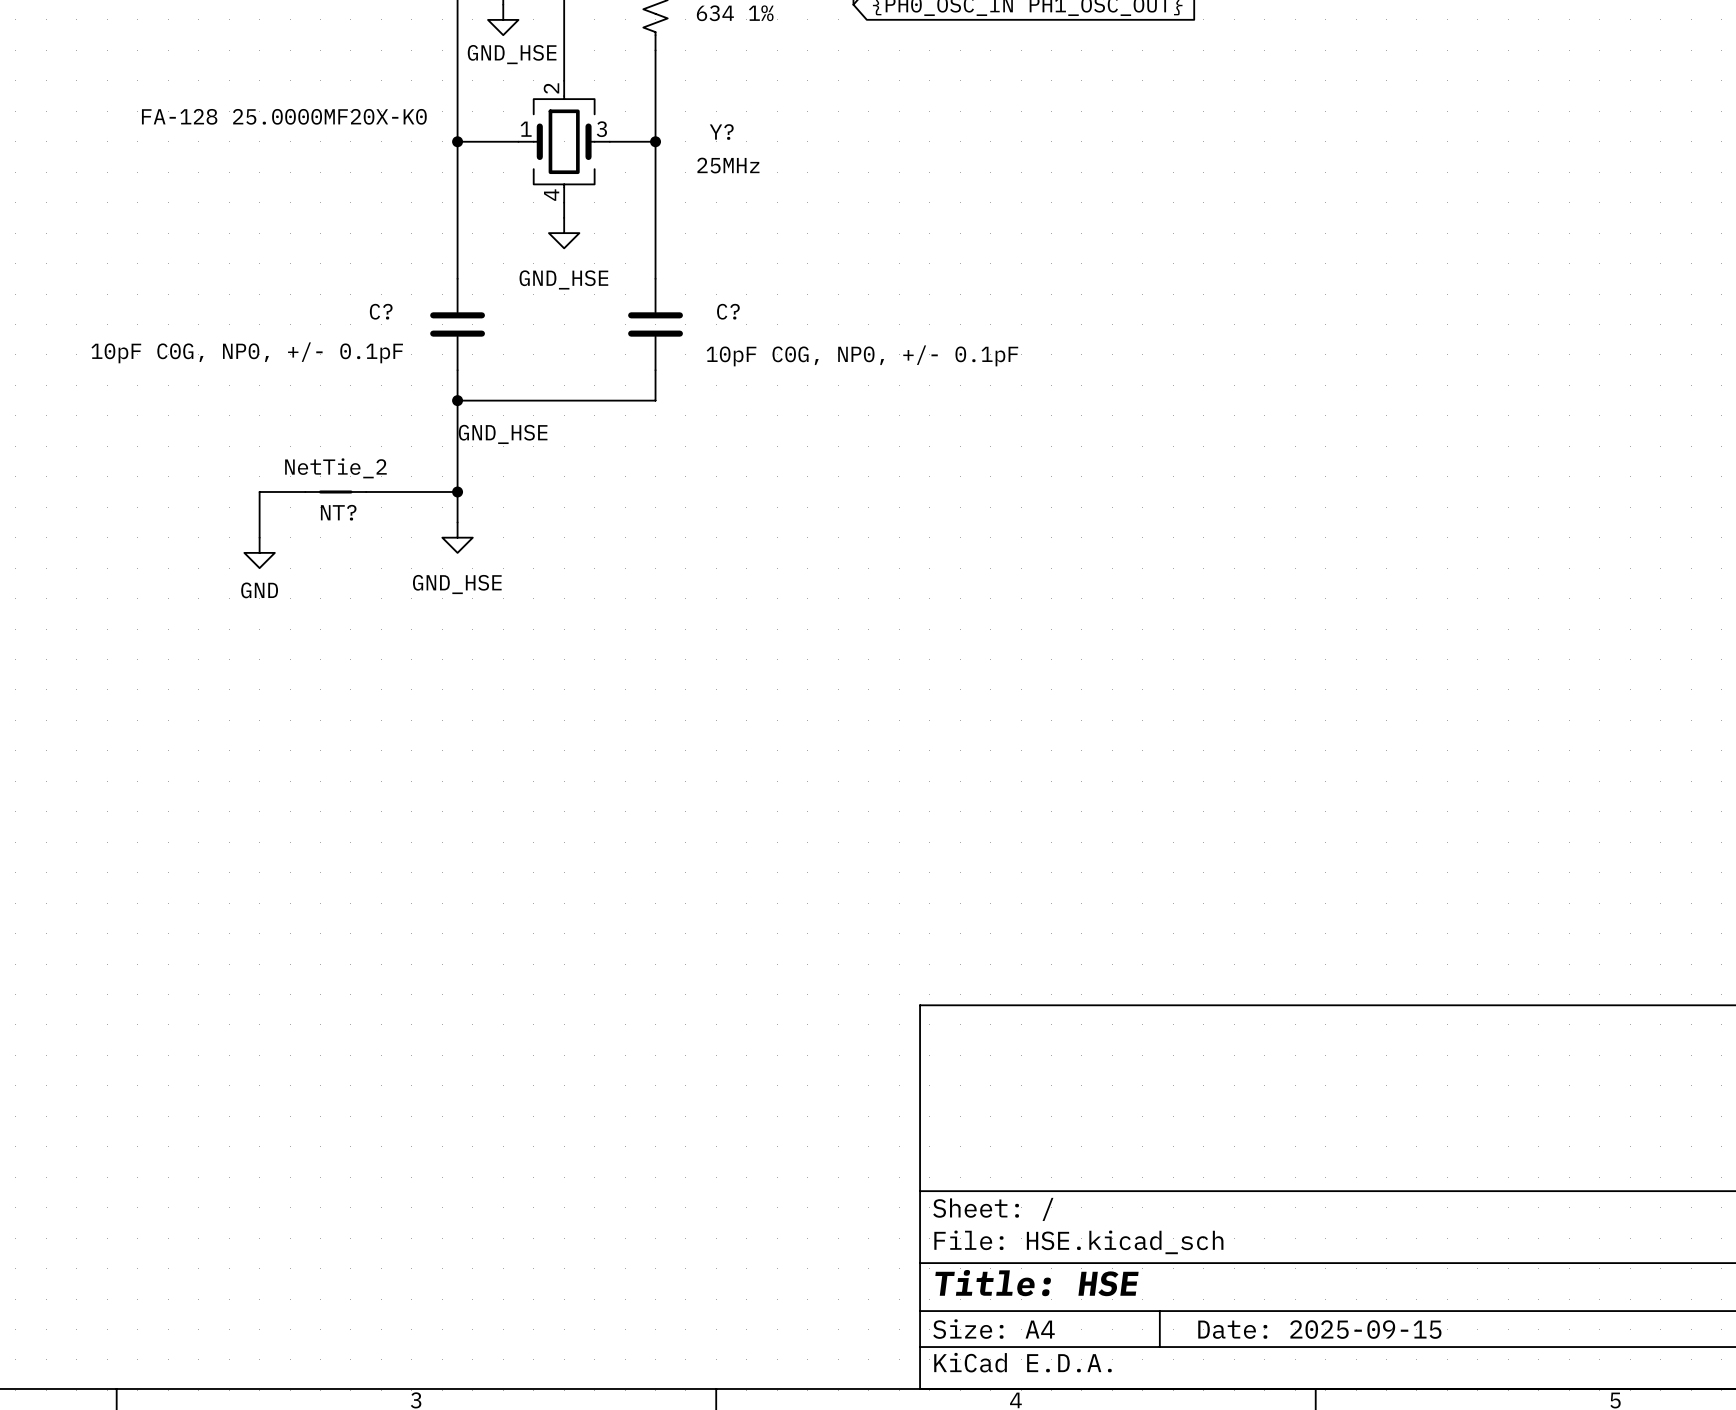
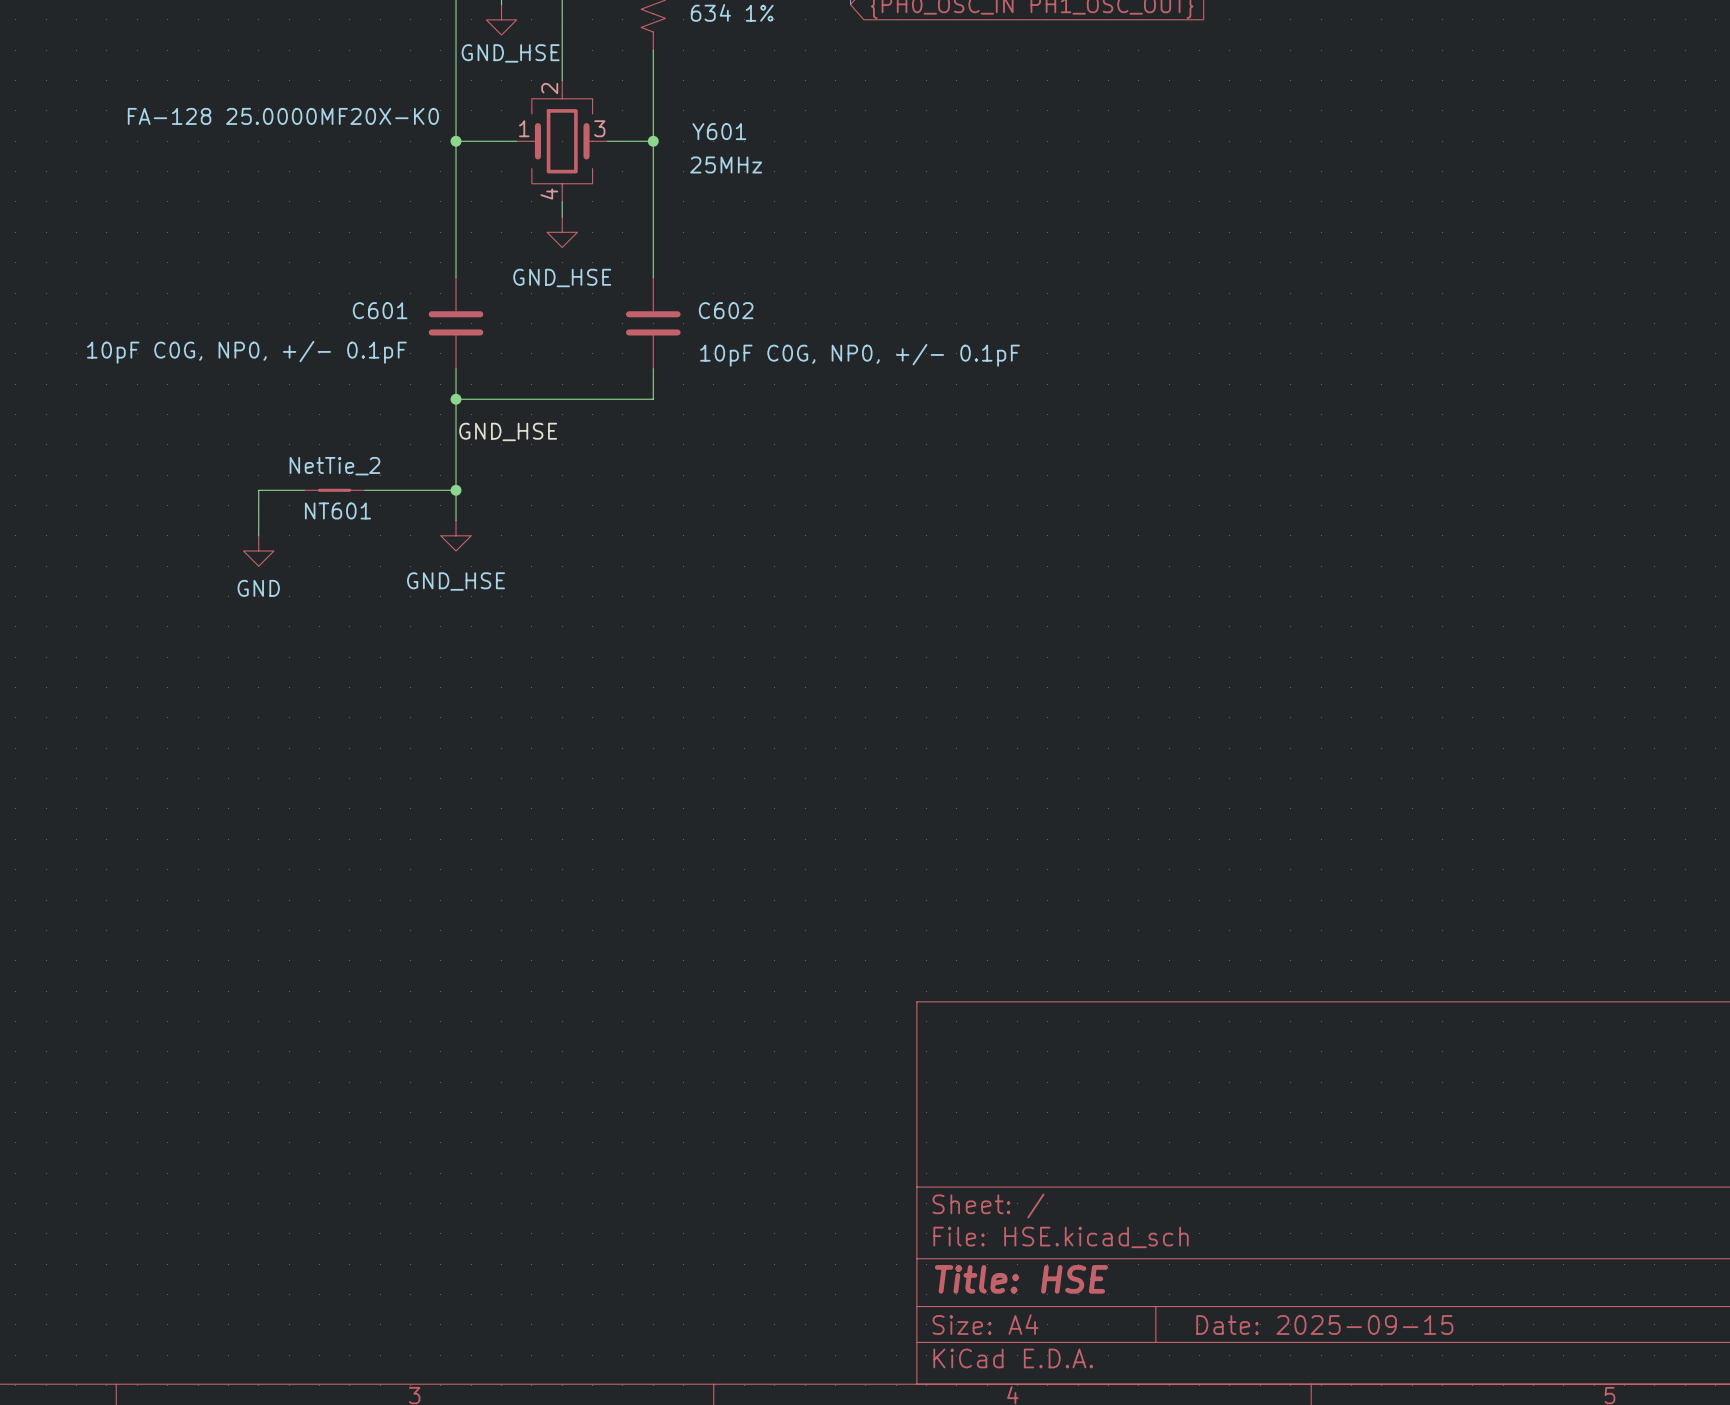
Y? name: Y? (721, 132) -> Y601 (719, 131)
C? name: C? (381, 311) -> C601 (380, 310)
C? name: C? (728, 311) -> C602 (726, 310)
NT? name: NT? (338, 512) -> NT601 (337, 510)

